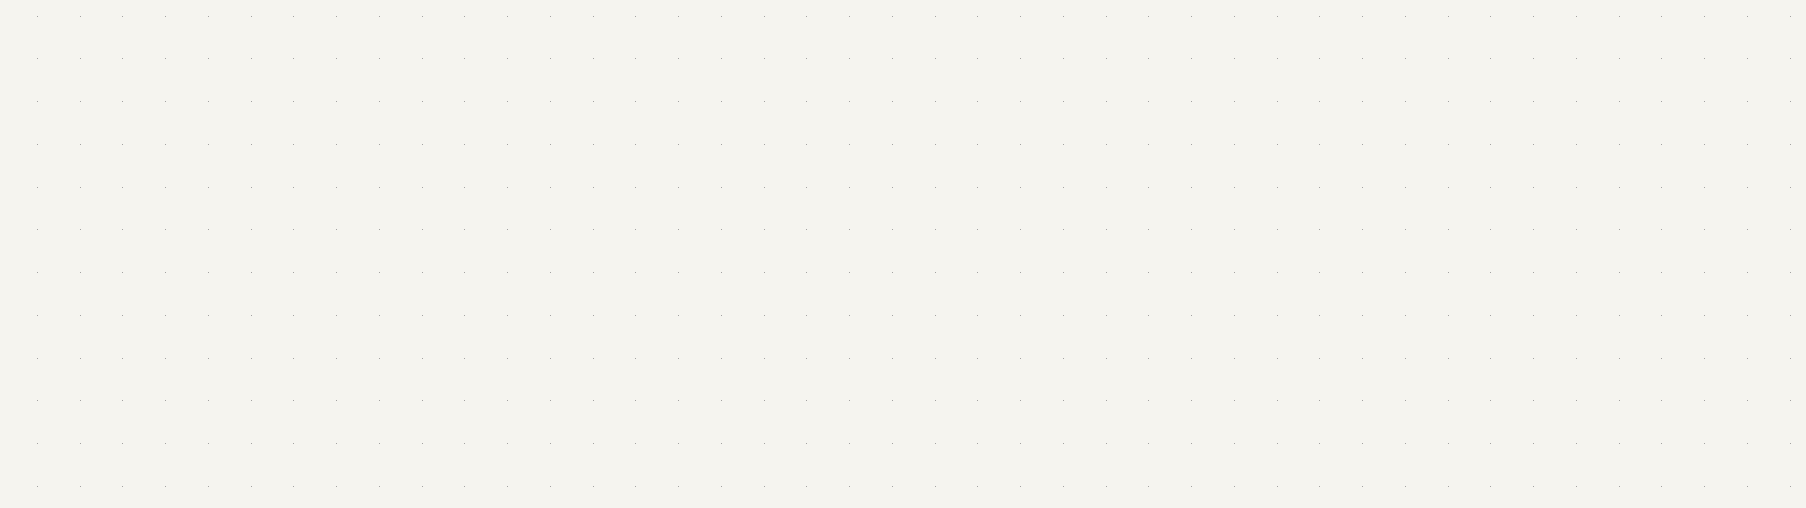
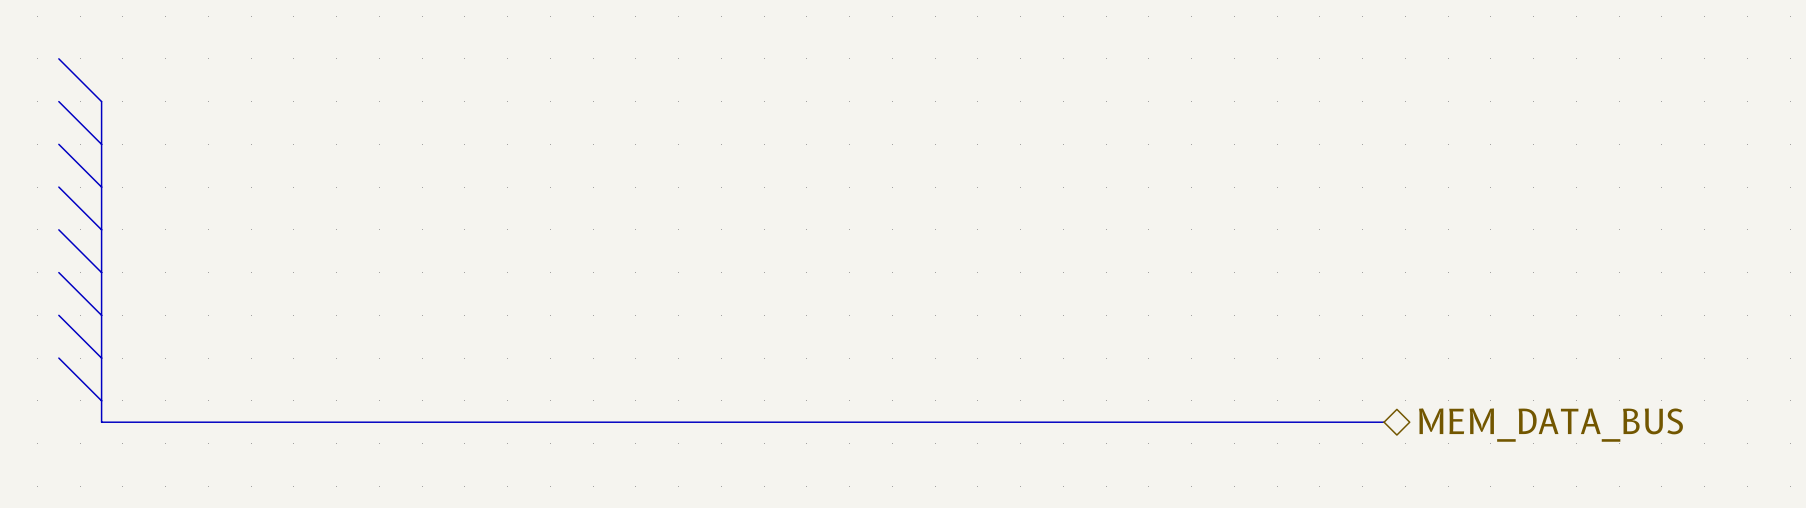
bus: none -> (58, 58) (101, 101) (101, 422) (1384, 422)
bus: none -> (58, 101) (101, 144)
bus: none -> (58, 144) (101, 187)
bus: none -> (58, 187) (101, 229)
bus: none -> (58, 229) (101, 272)
bus: none -> (58, 272) (101, 315)
bus: none -> (58, 315) (101, 358)
bus: none -> (58, 358) (101, 400)
hierarchical label: none -> MEM_DATA_BUS (1550, 425)

